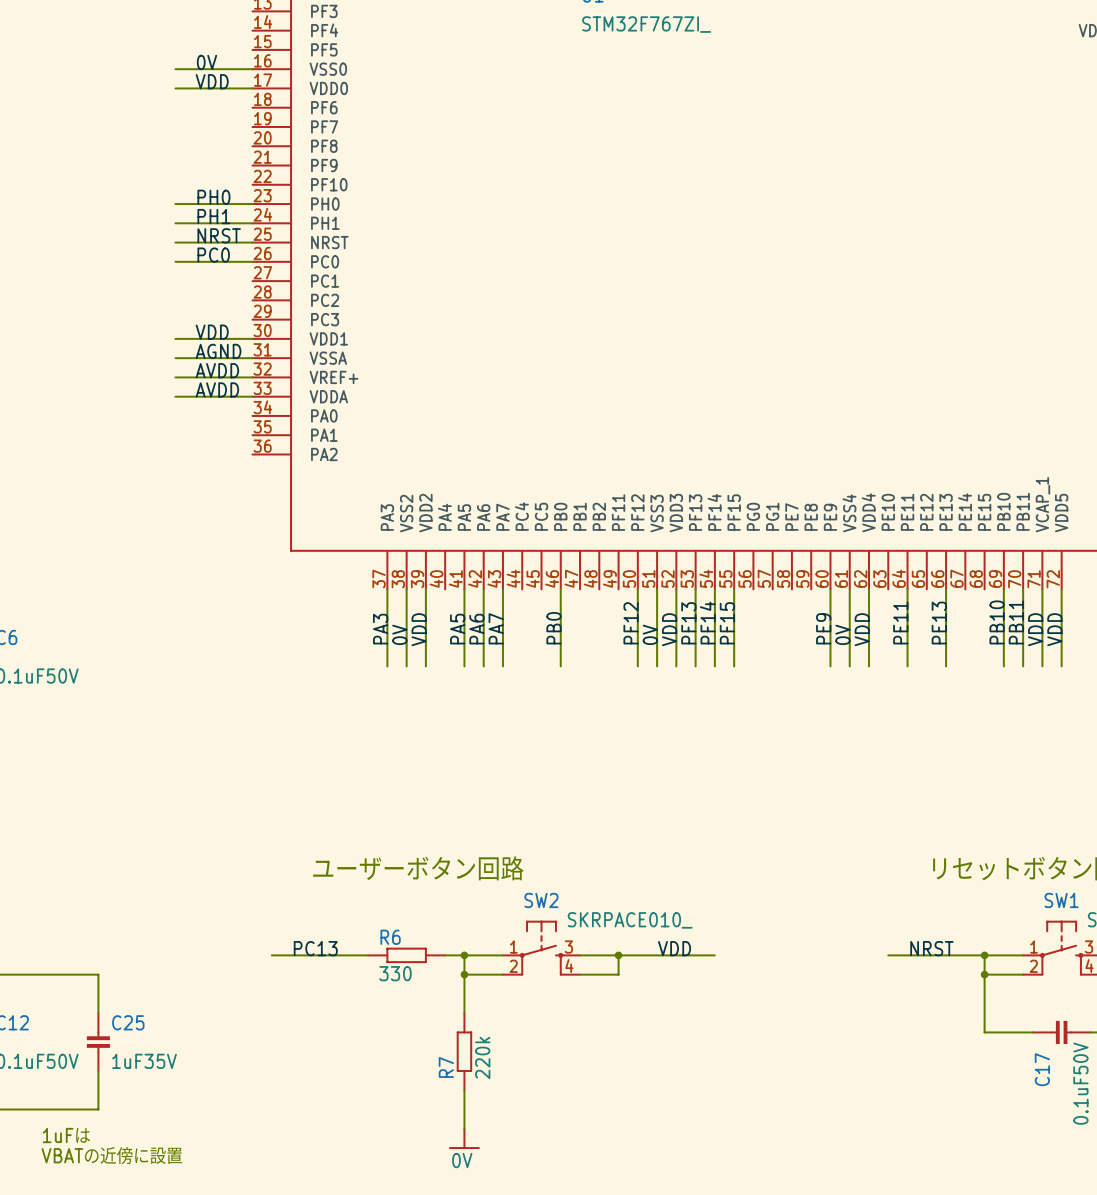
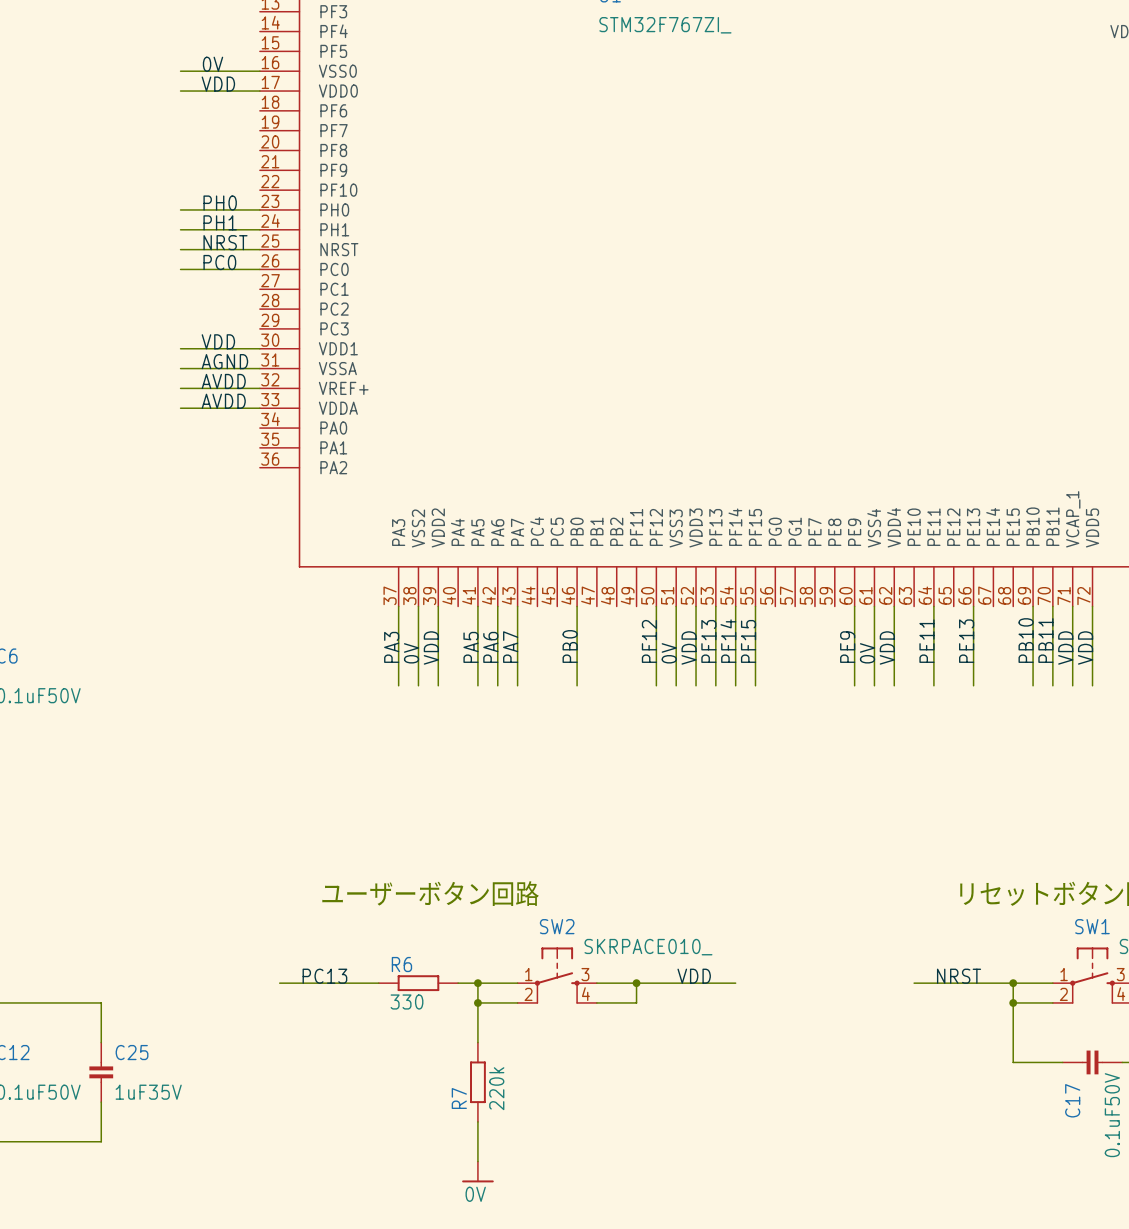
text: 1uFは (66, 1135) -> none
text: VBATの近傍に設置 (112, 1155) -> none

